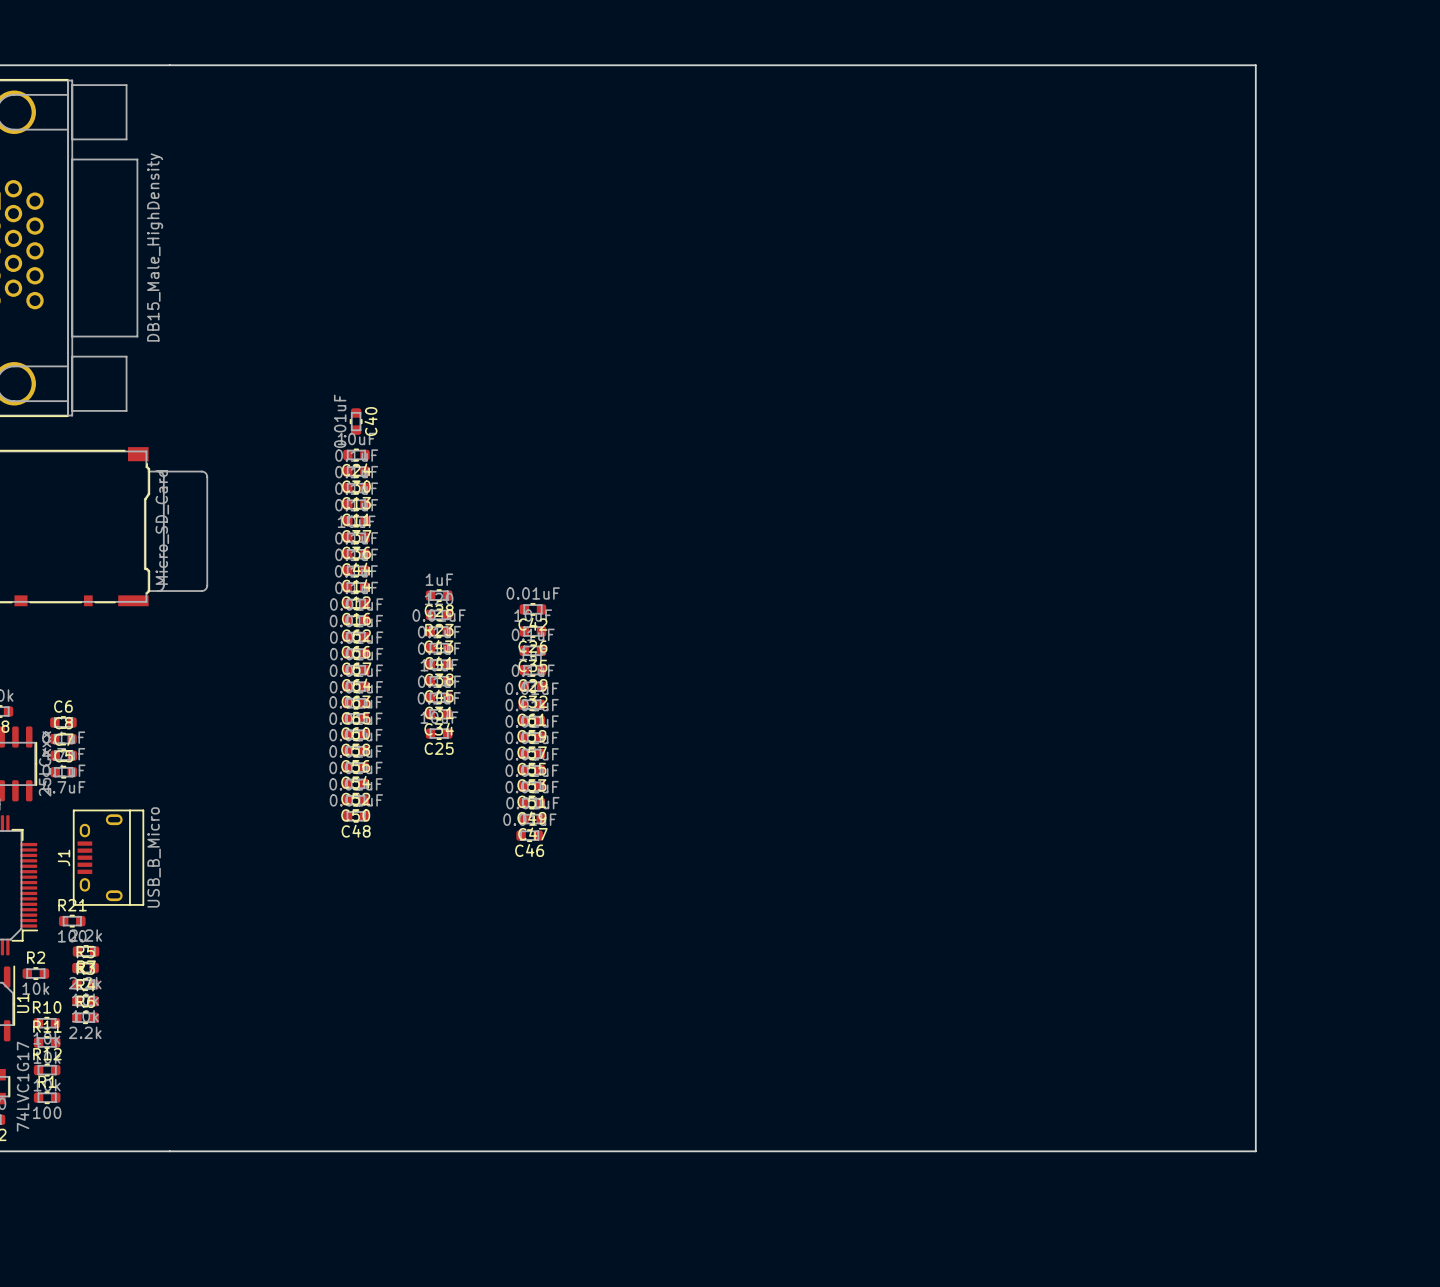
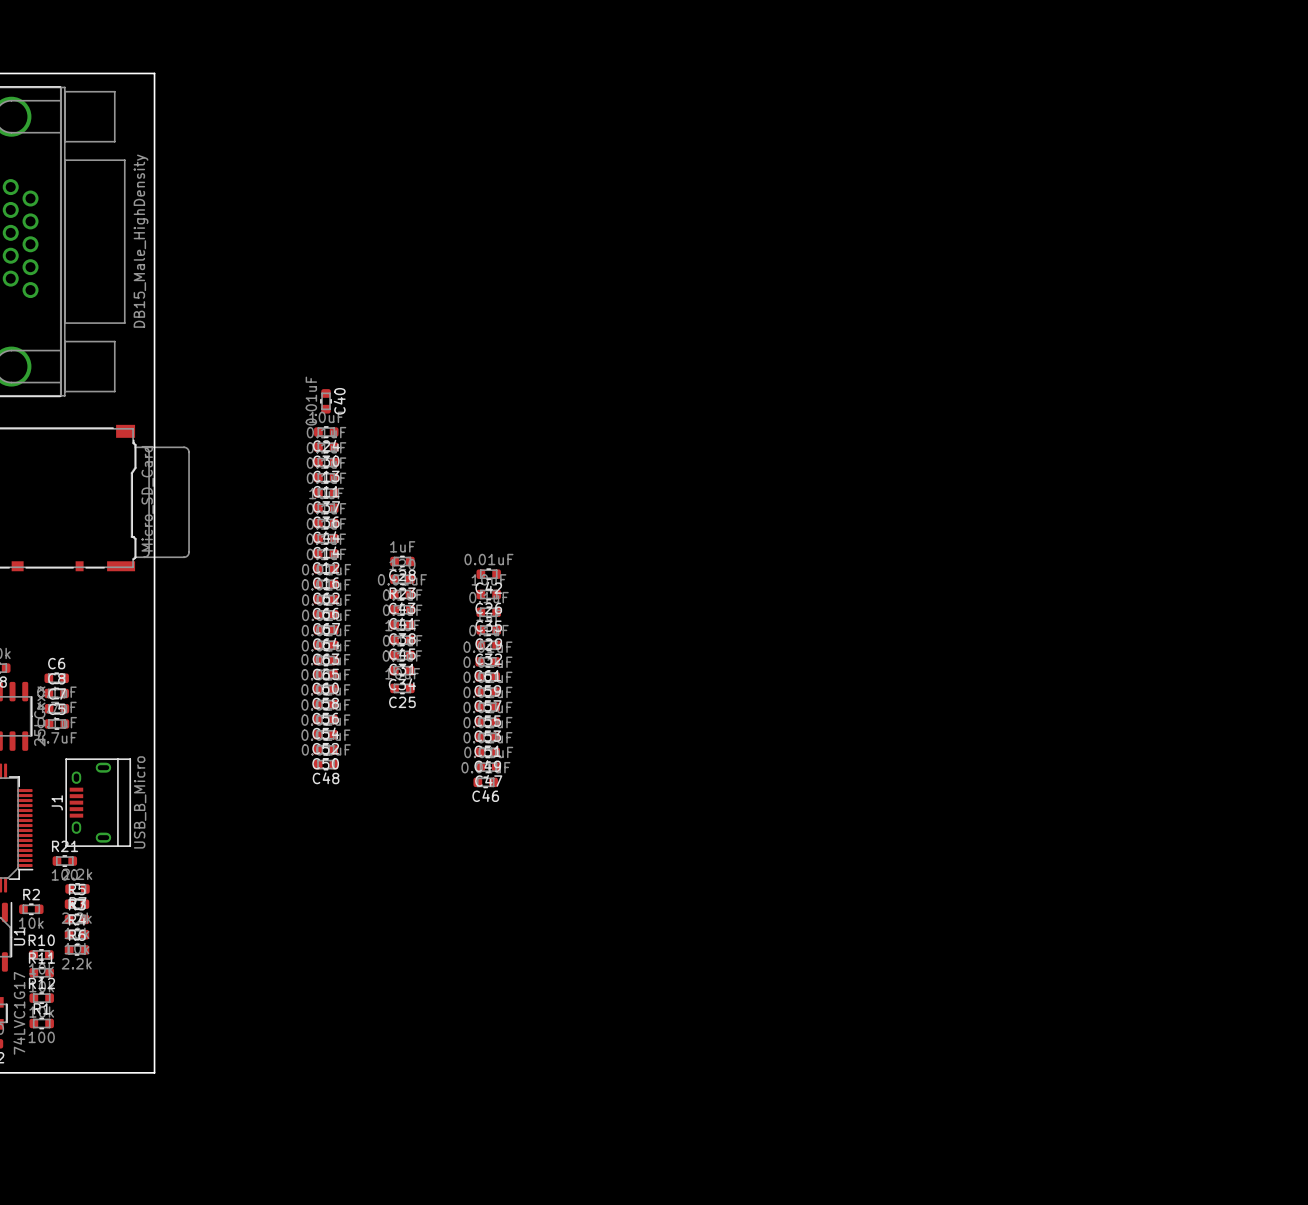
board edge: (169, 65) (1255, 65) (1255, 1151) (169, 1151) -> (154, 73) (154, 1072)

